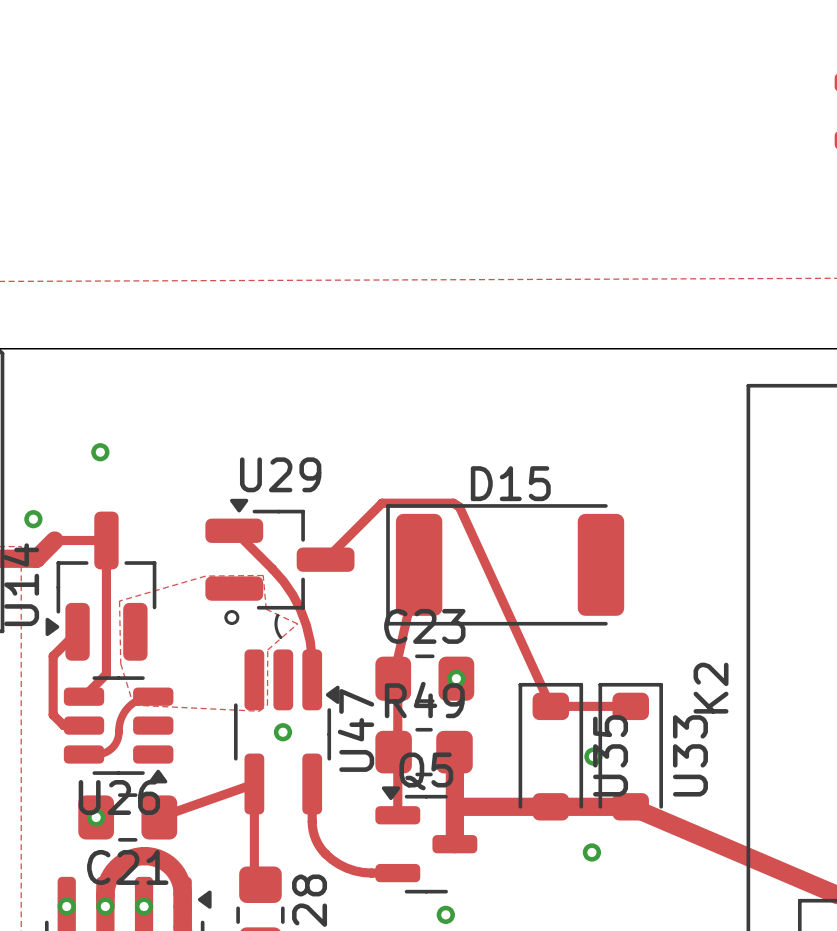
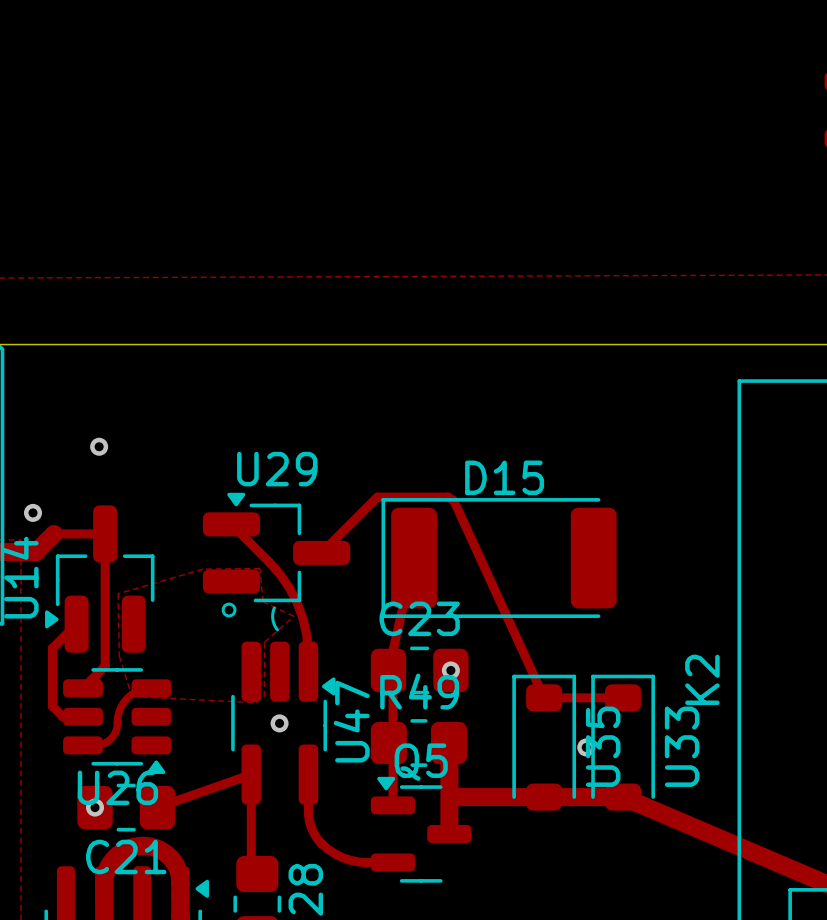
via: (591, 852) -> none
via: (66, 906) -> none
via: (105, 906) -> none
via: (144, 906) -> none
via: (445, 914) -> none

